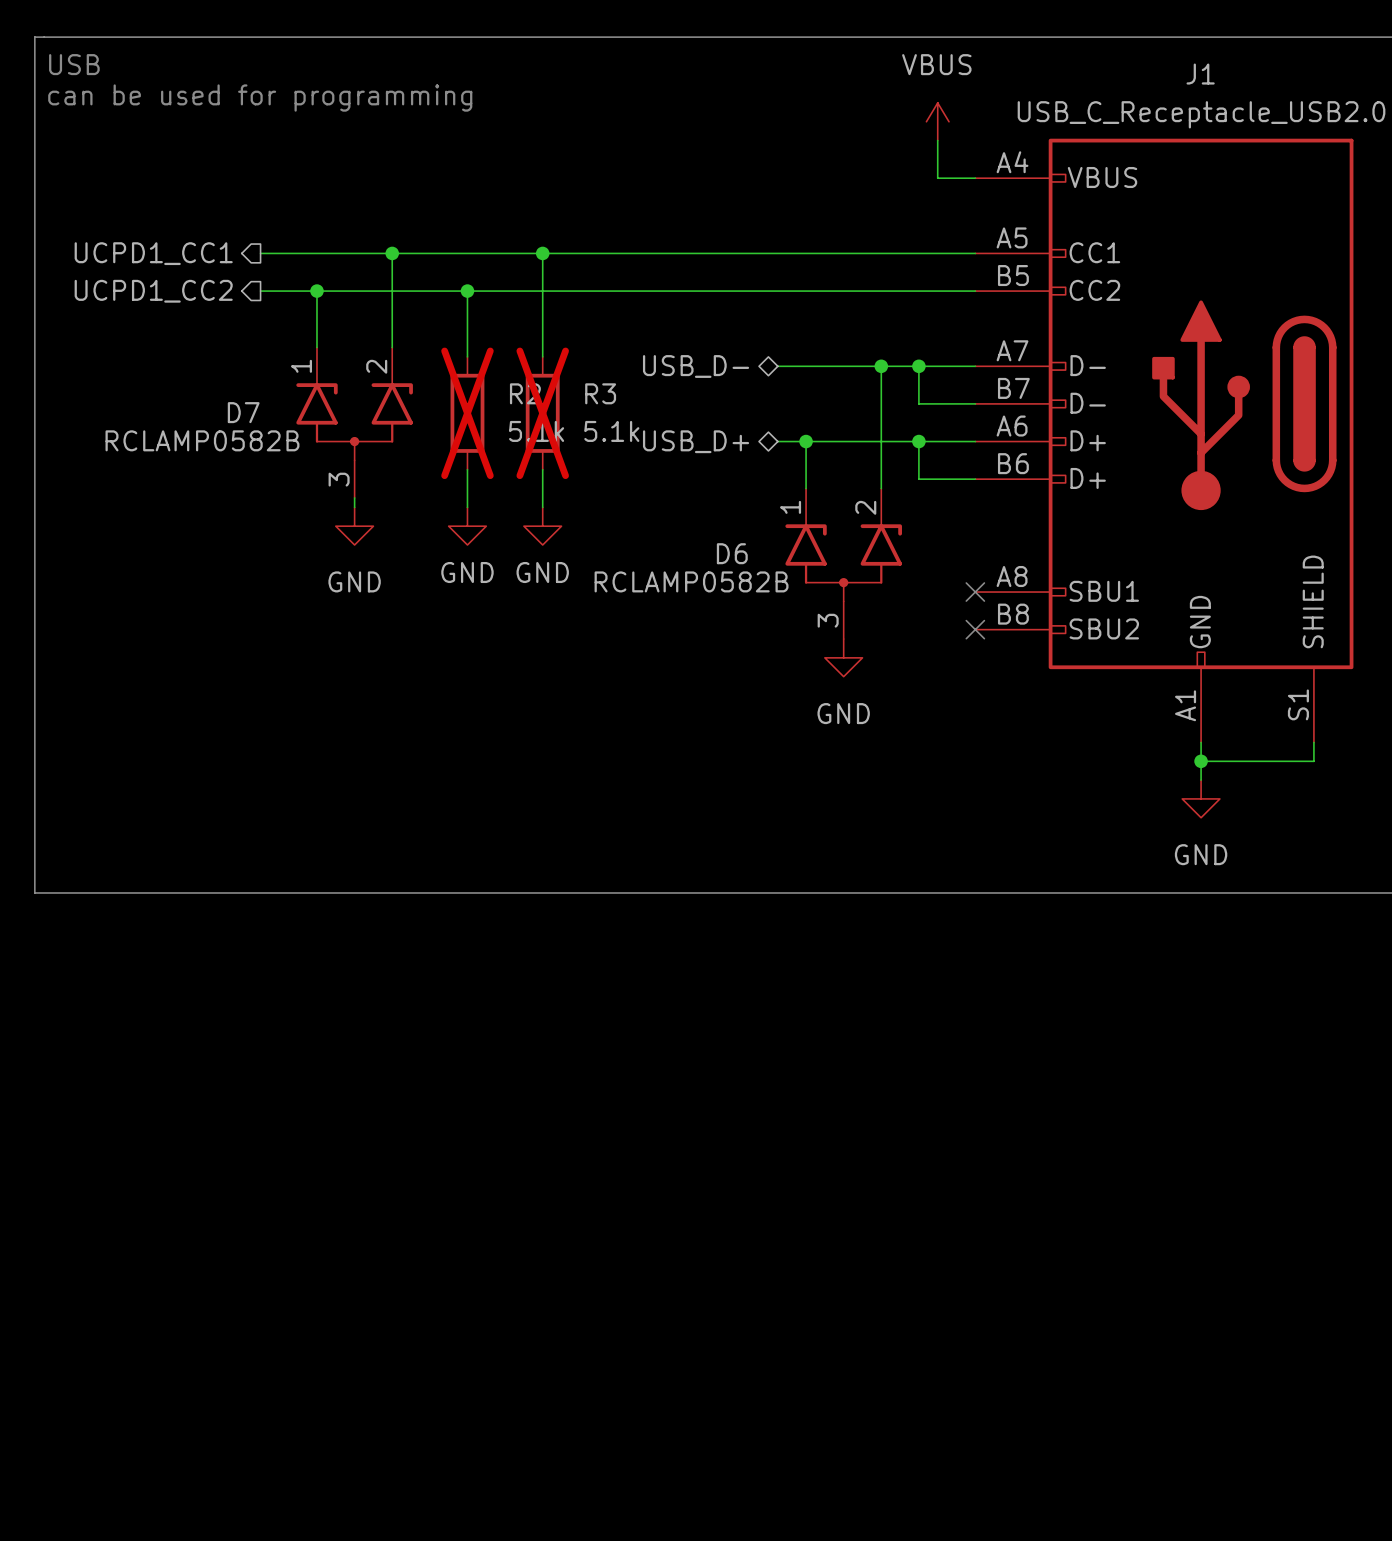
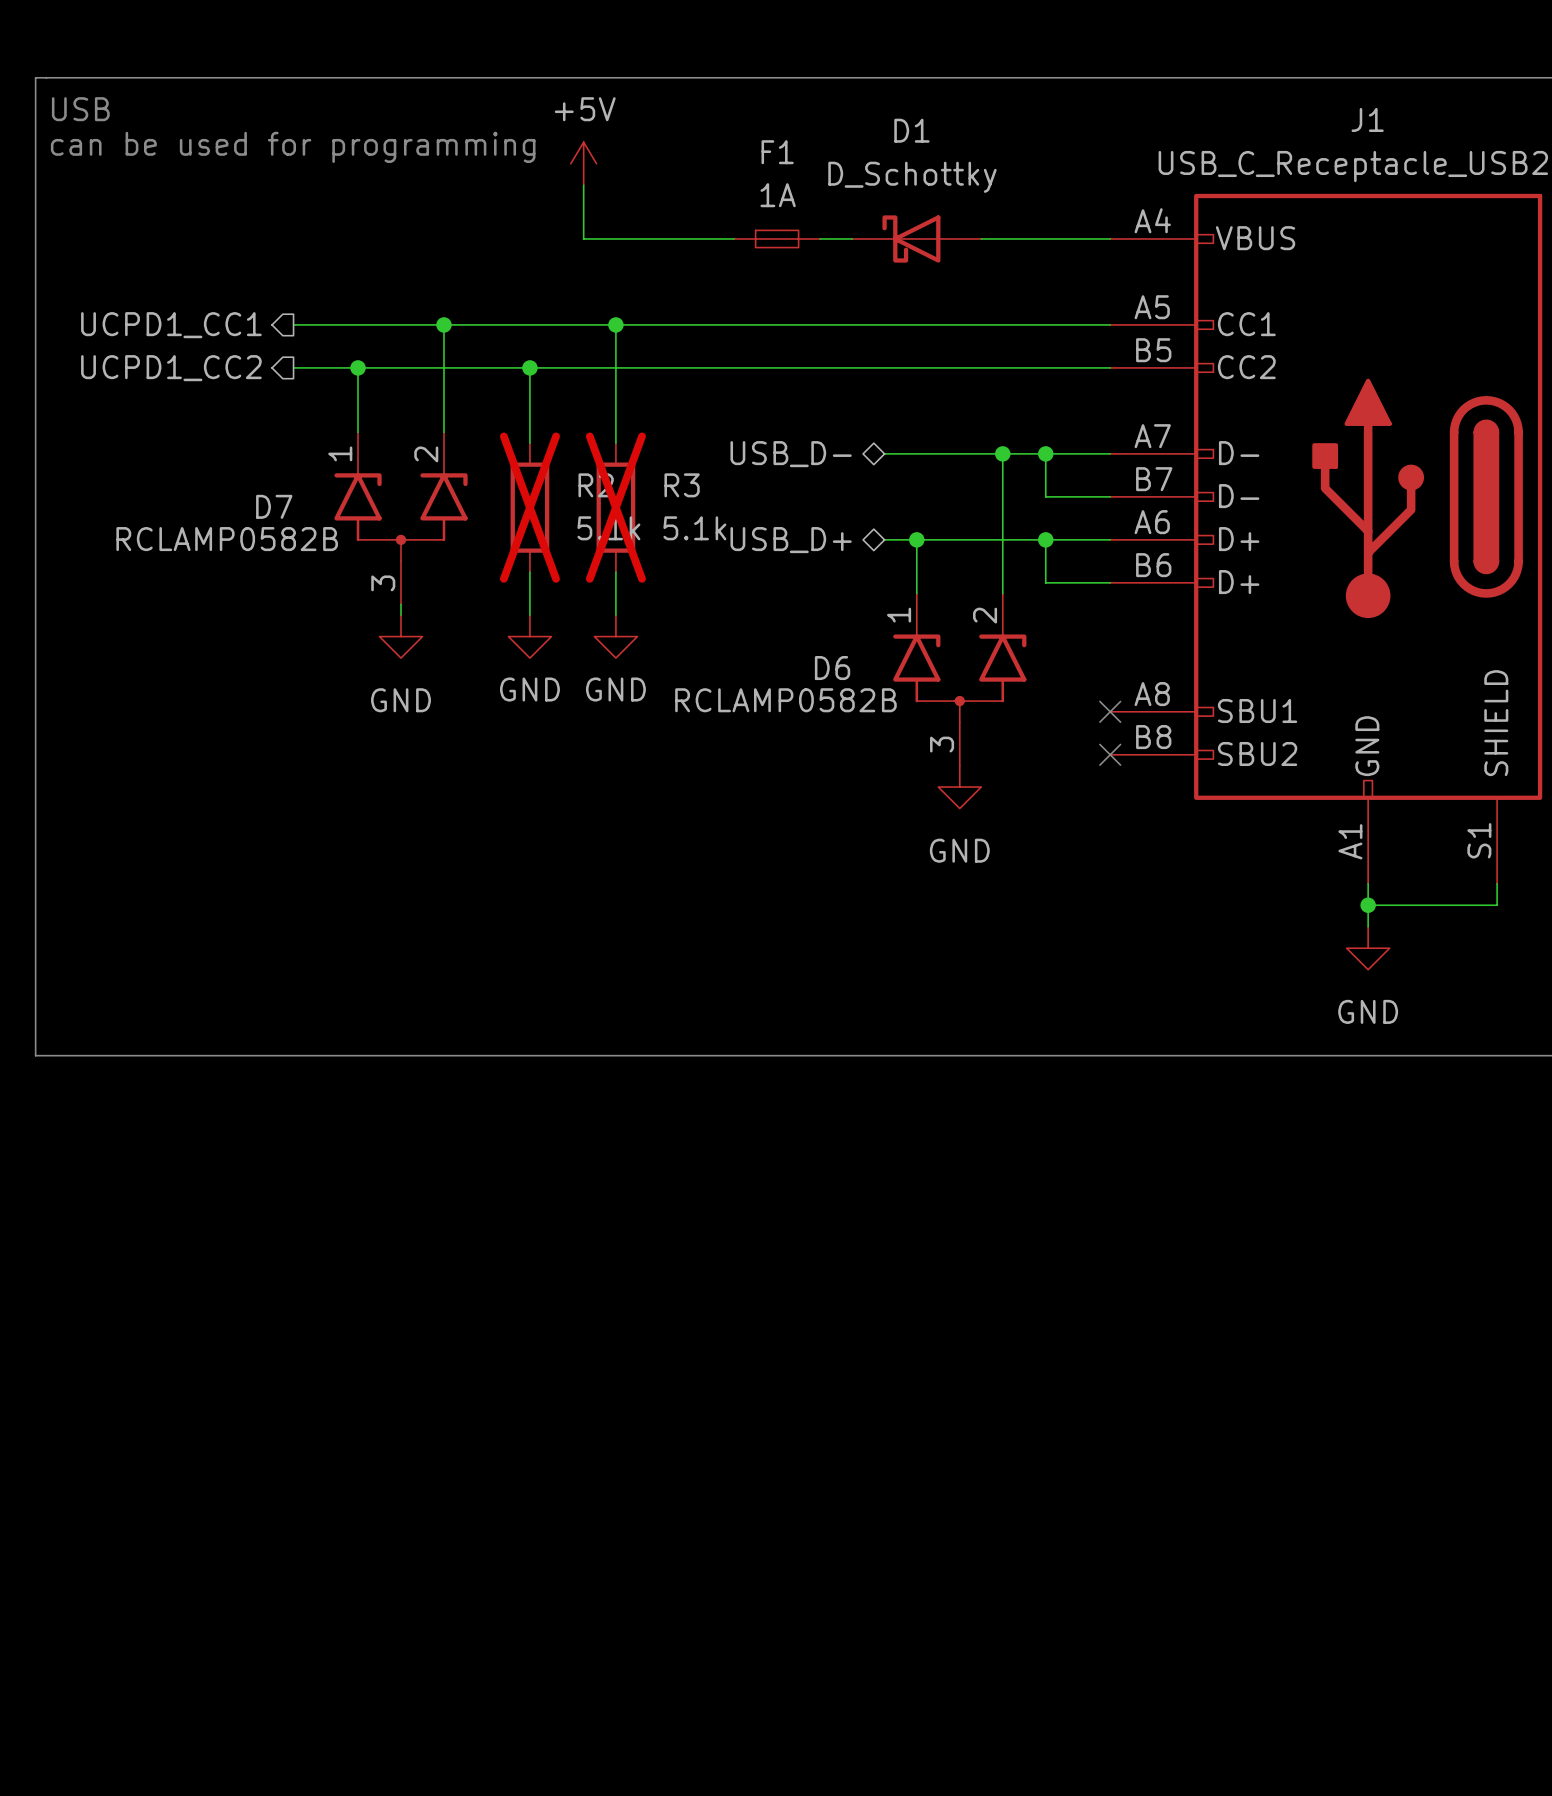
power symbol: none -> +5V (583, 163)
power symbol: VBUS (937, 121) -> none
wire: none -> (583, 185) (583, 238) (734, 238)
wire: (937, 140) (937, 178) -> (981, 238) (1067, 238)
F1: none -> 1A (777, 238)
wire: none -> (820, 238) (852, 238)
D1: none -> D_Schottky (916, 238)

